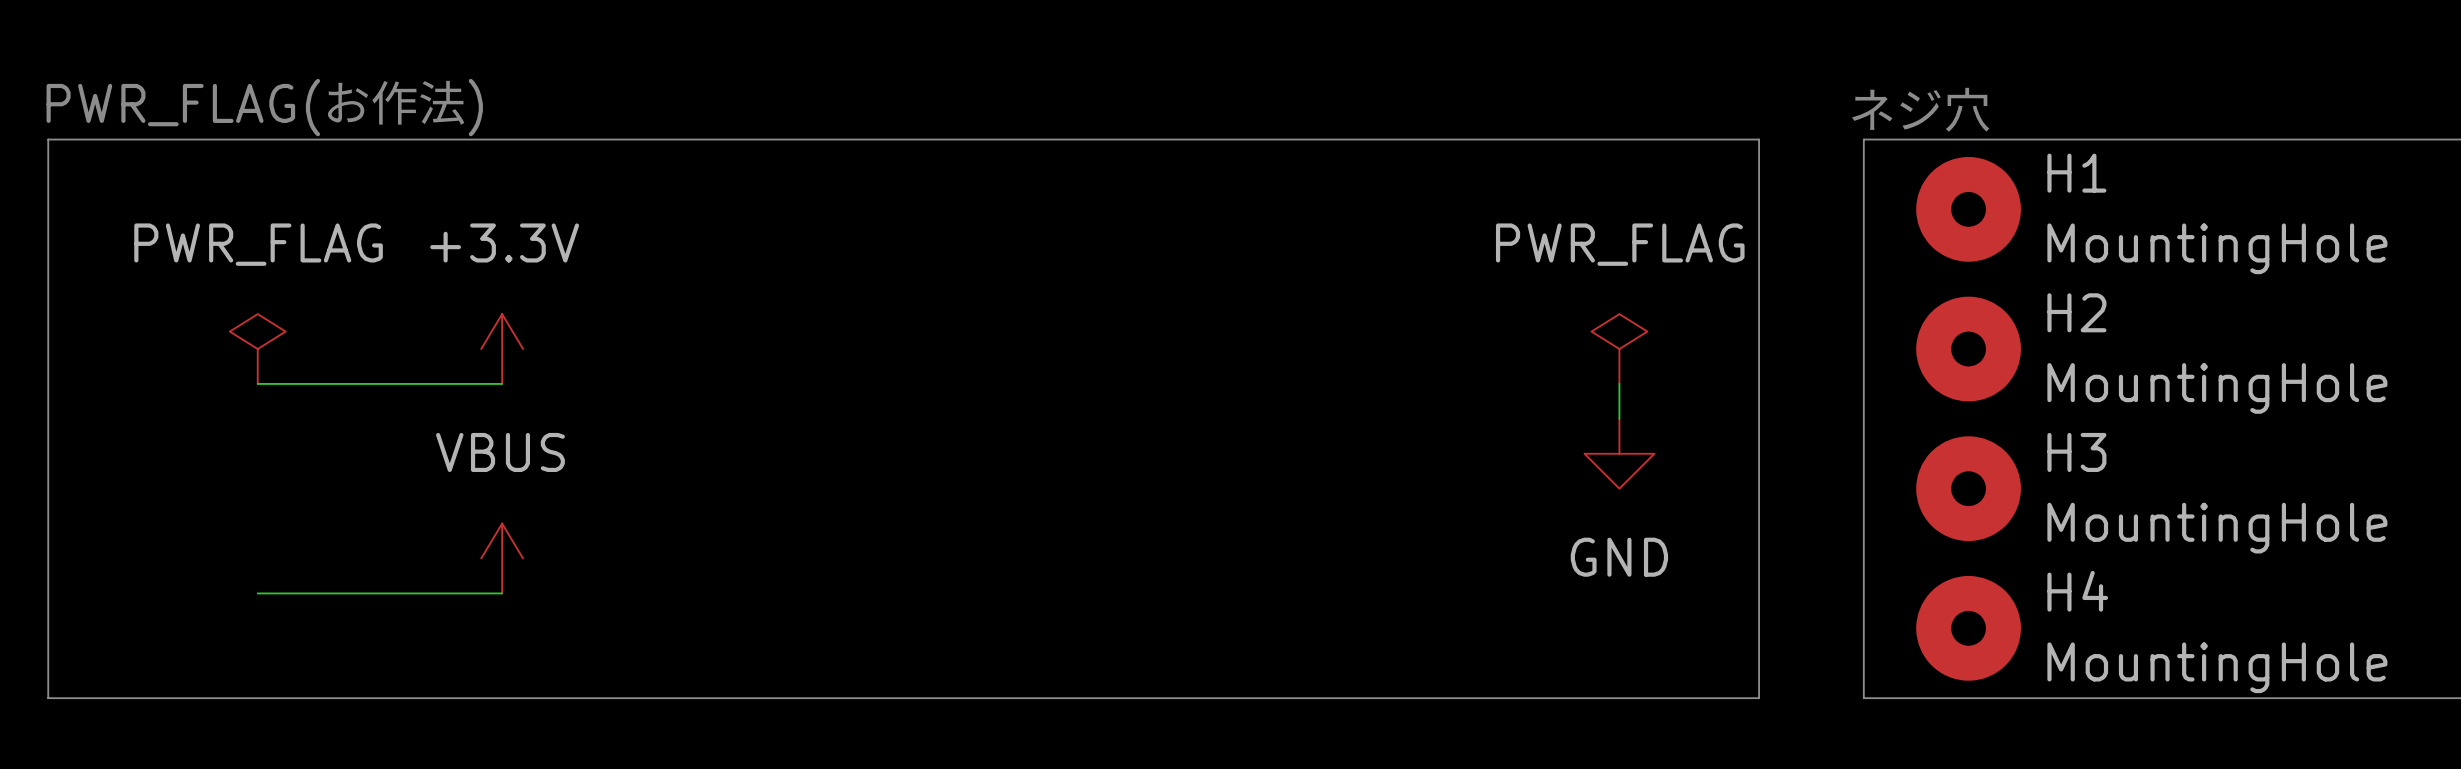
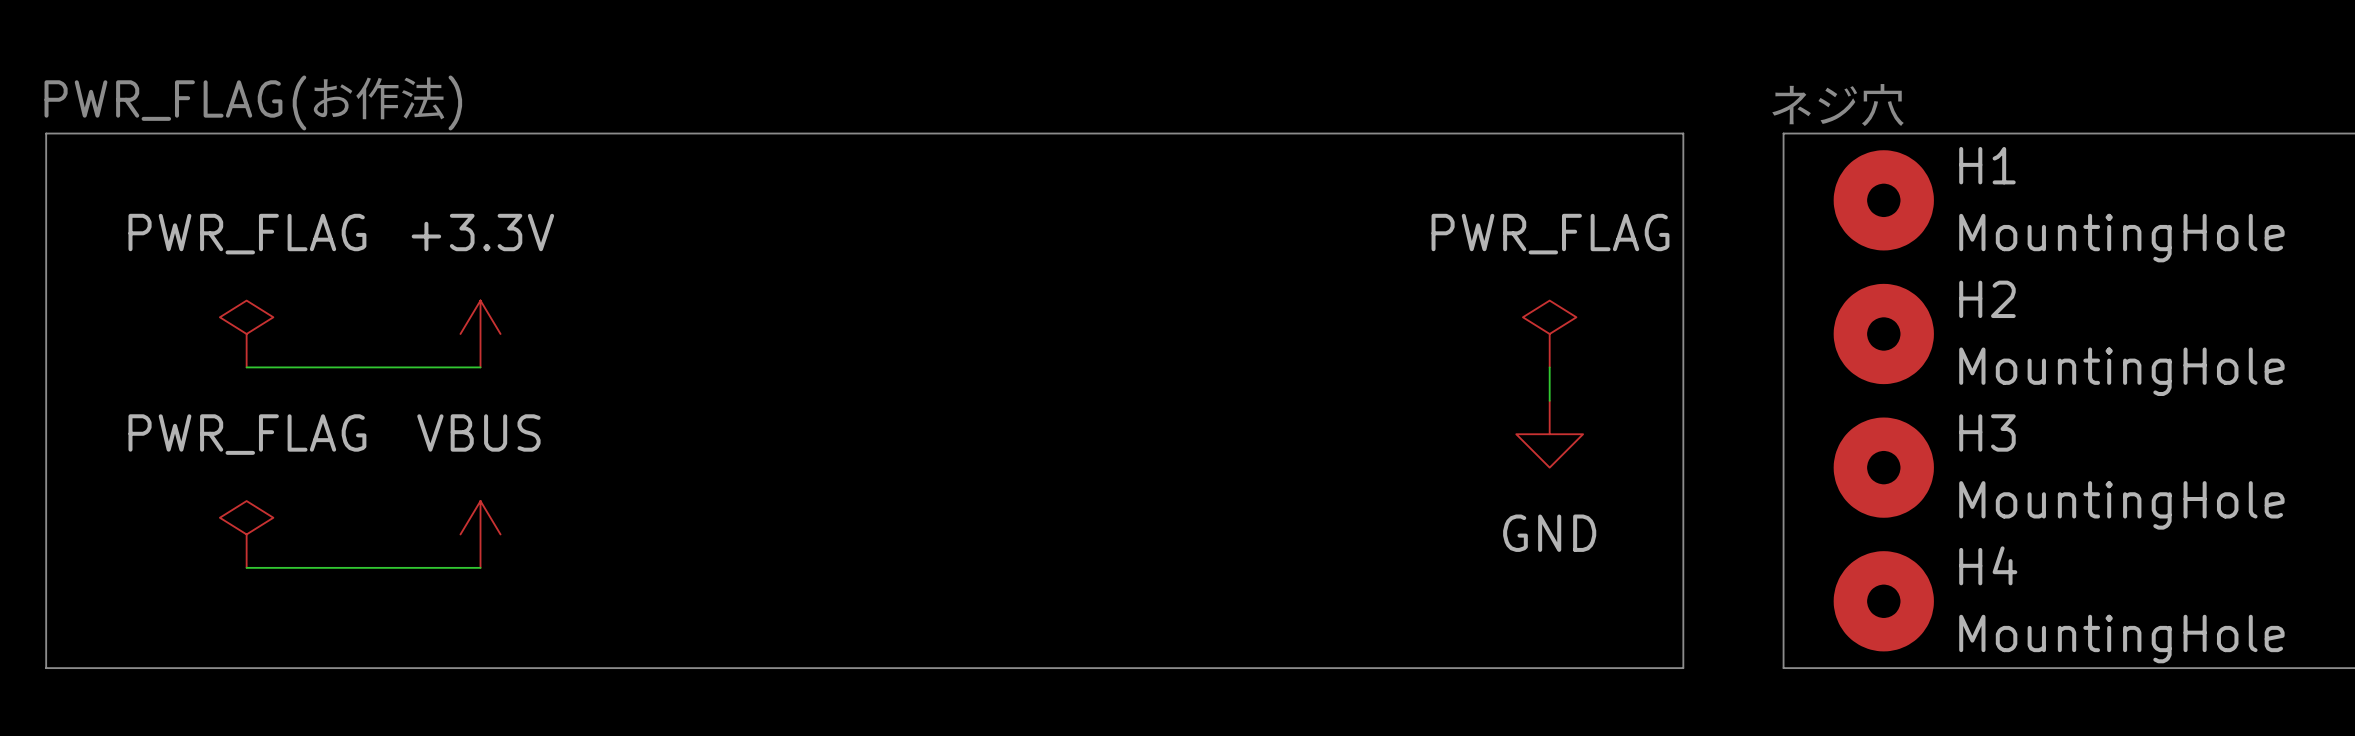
power symbol: none -> PWR_FLAG (246, 534)

